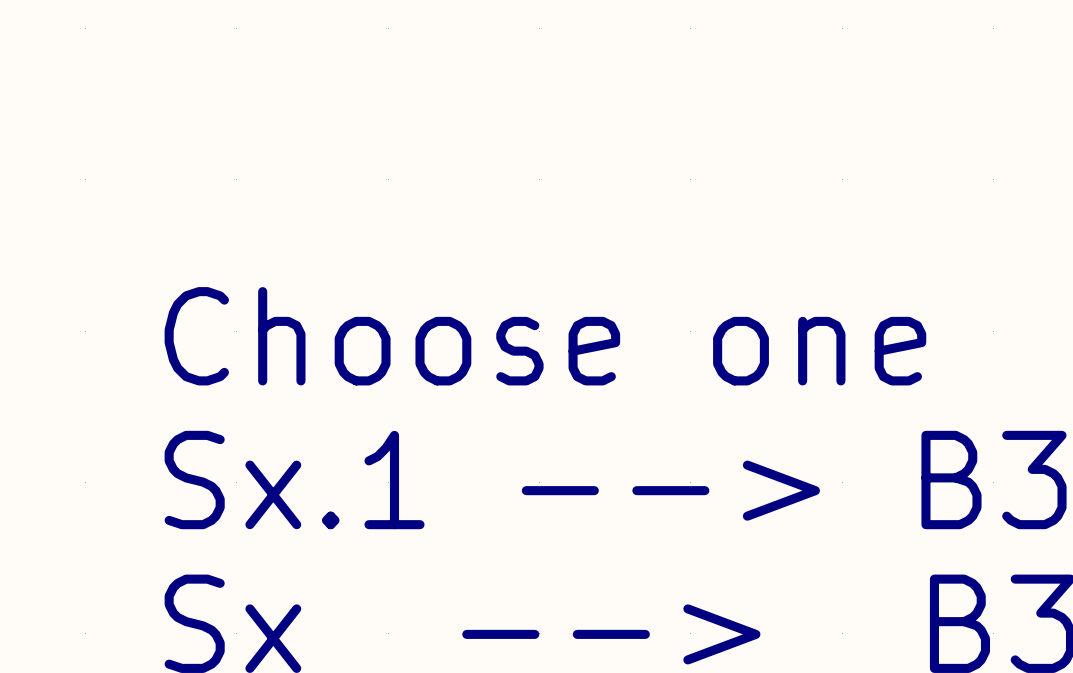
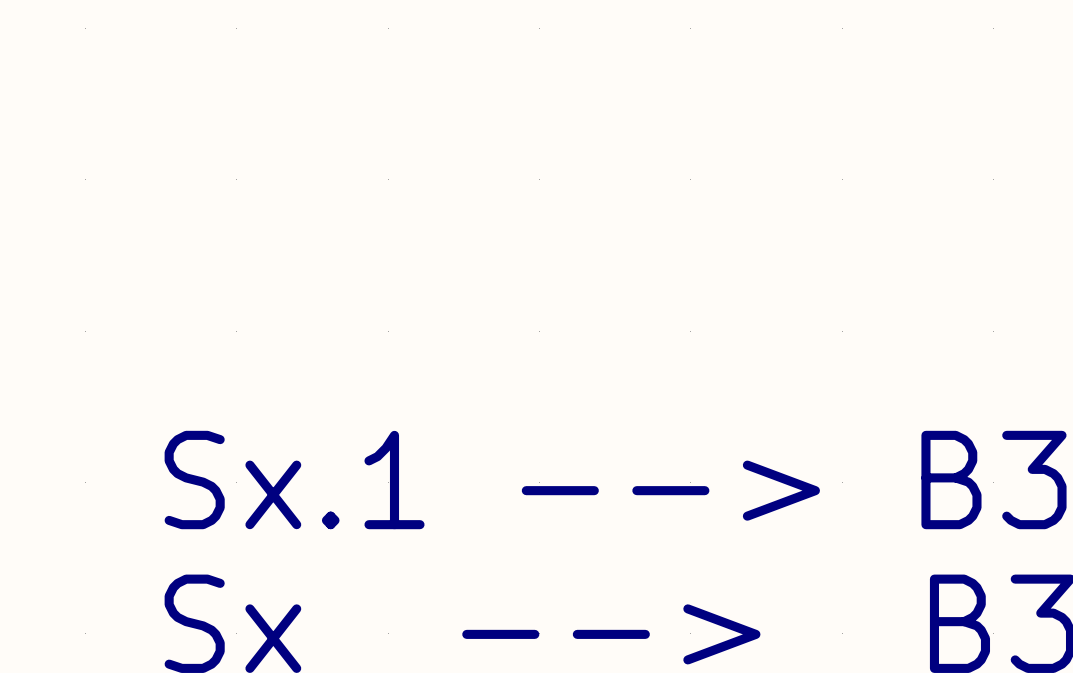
text: Choose one (545, 336) -> none

